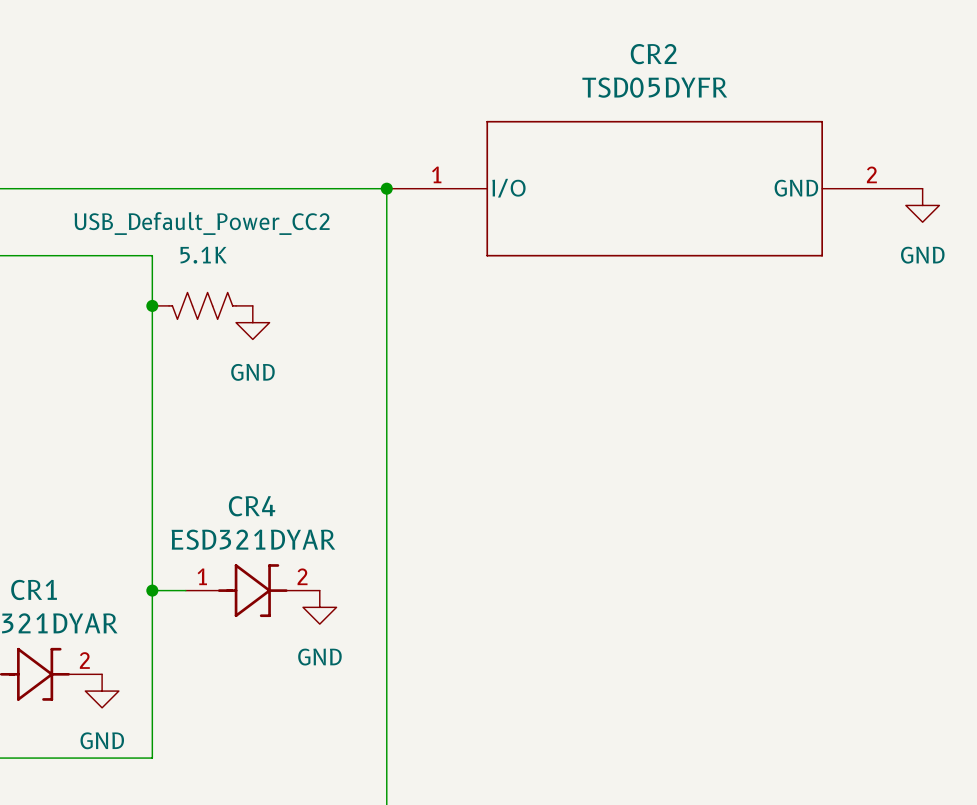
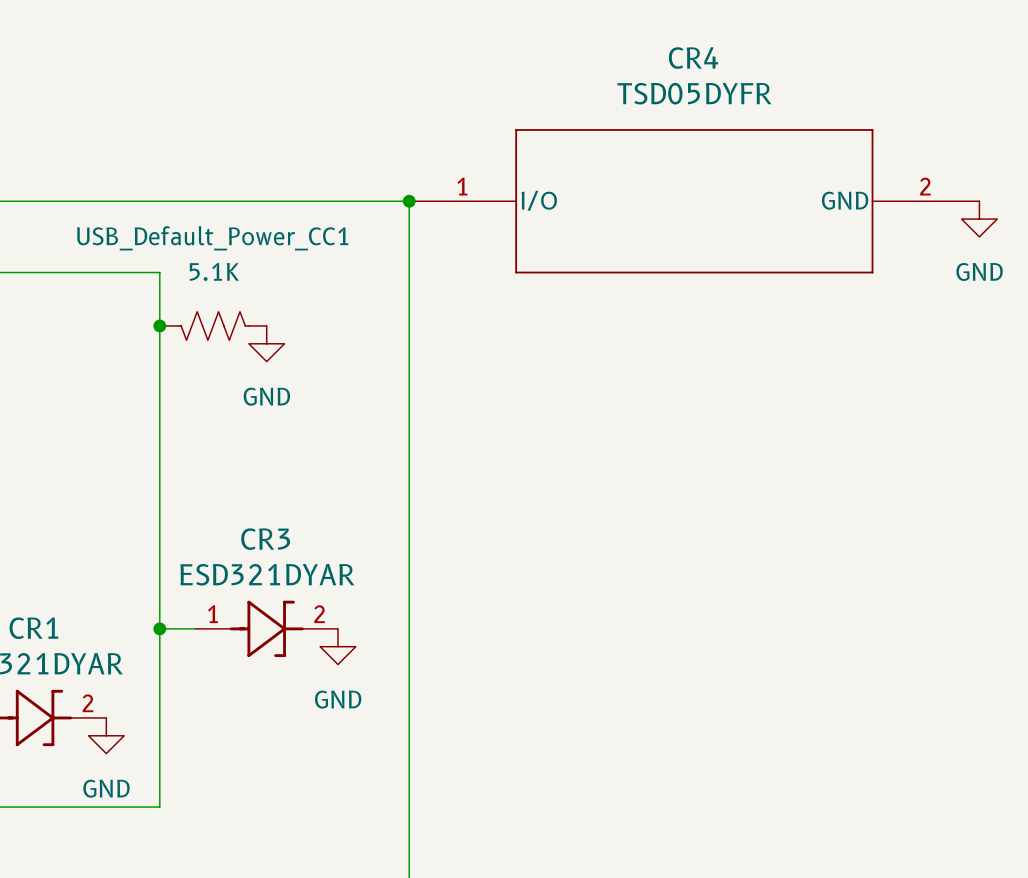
CR2 name: CR2 (653, 54) -> CR4 (693, 58)
USB_Default_Power_CC2 name: USB_Default_Power_CC2 (202, 223) -> USB_Default_Power_CC1 (212, 238)
CR4 name: CR4 (252, 506) -> CR3 (265, 539)

